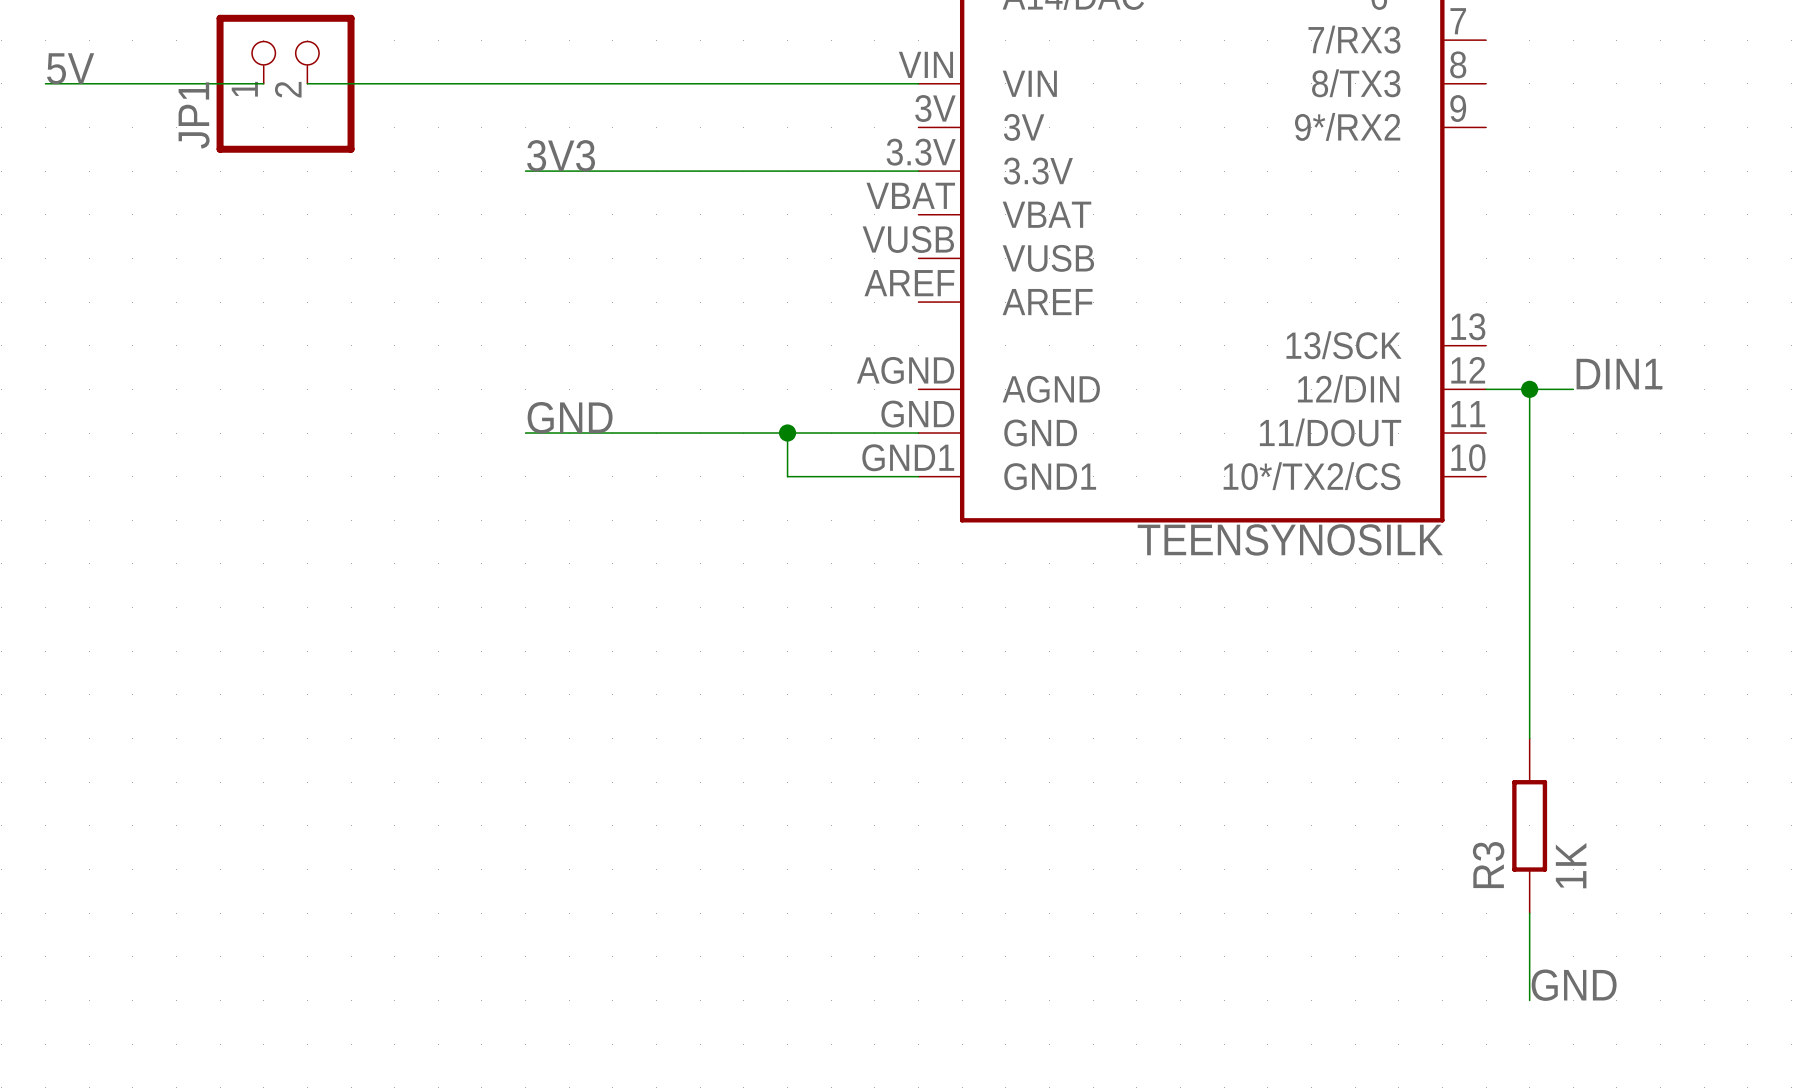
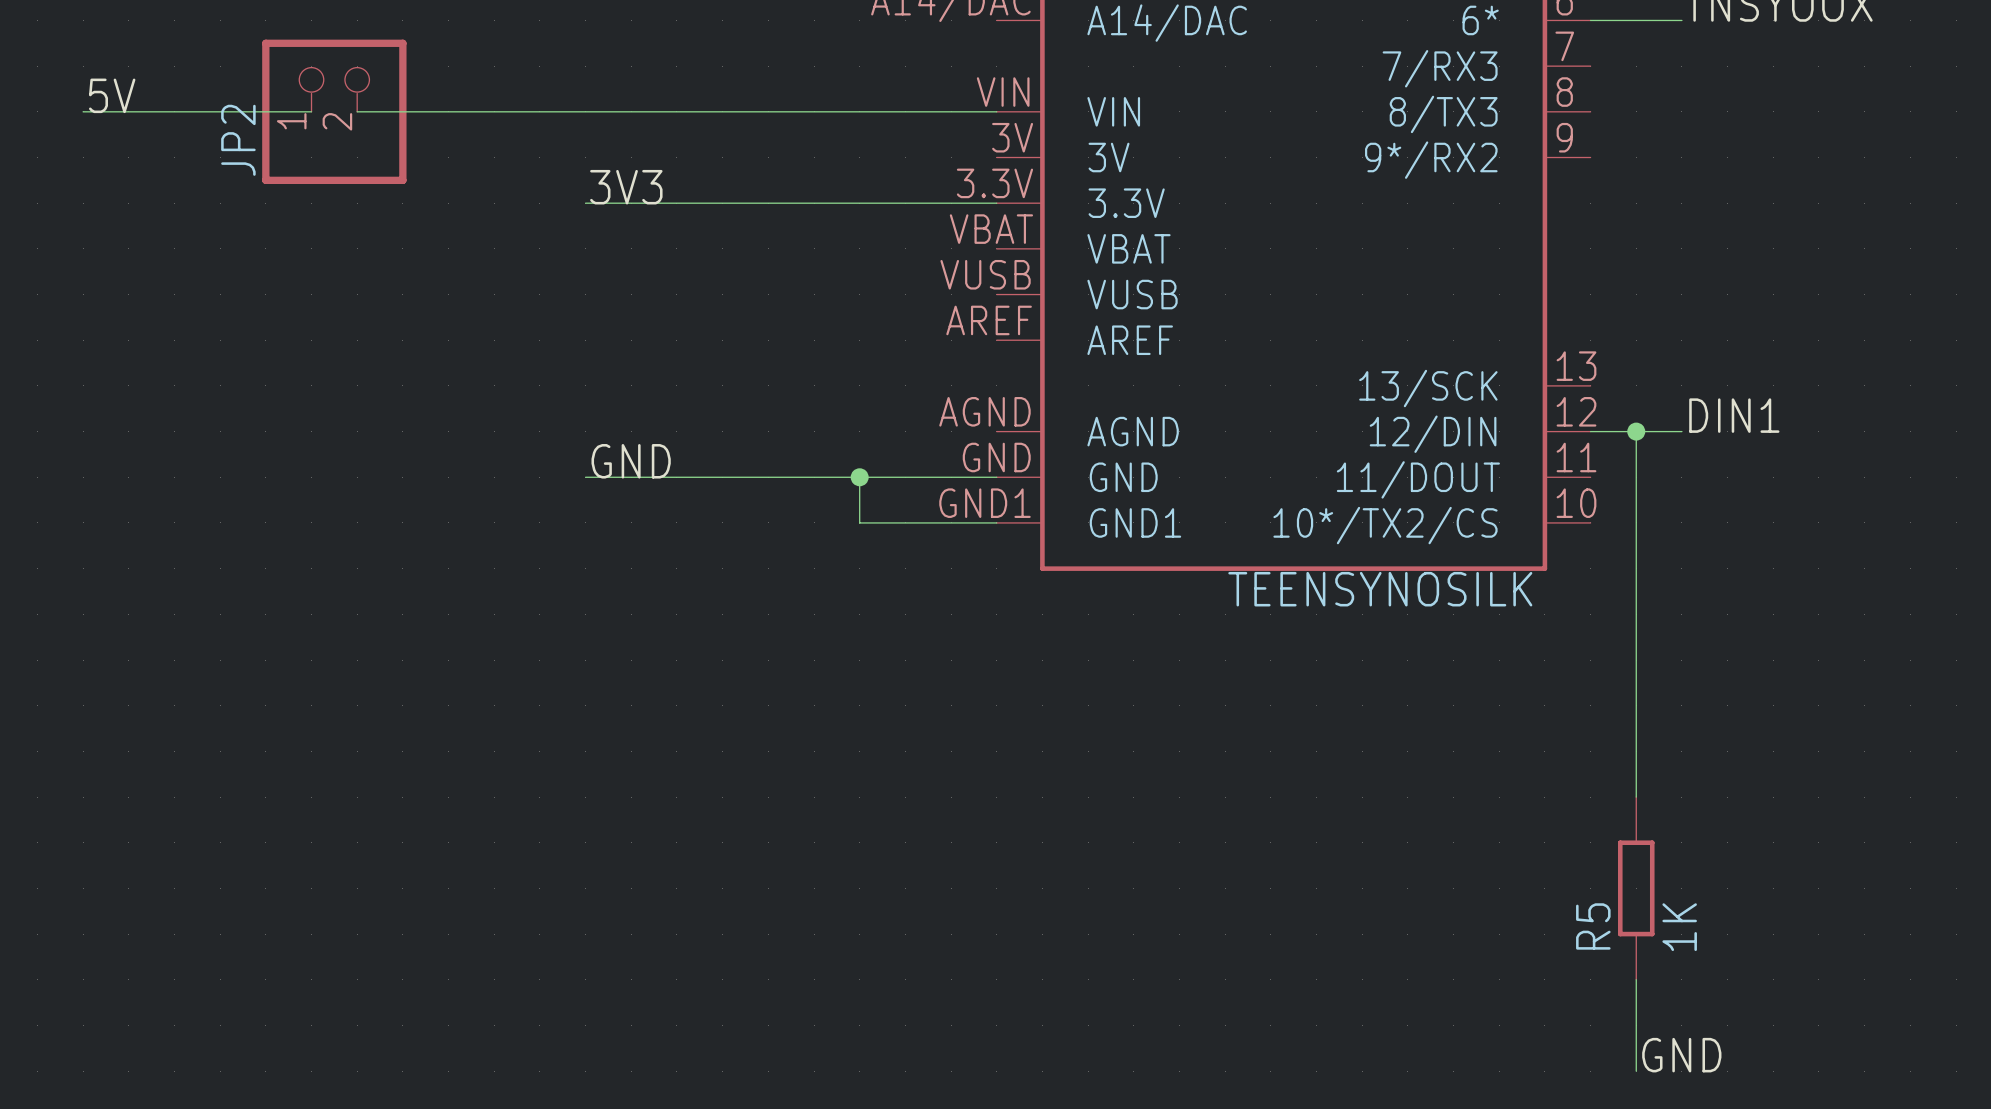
JP1 name: JP1 (194, 115) -> JP2 (238, 140)
R3 name: R3 (1488, 865) -> R5 (1593, 926)

